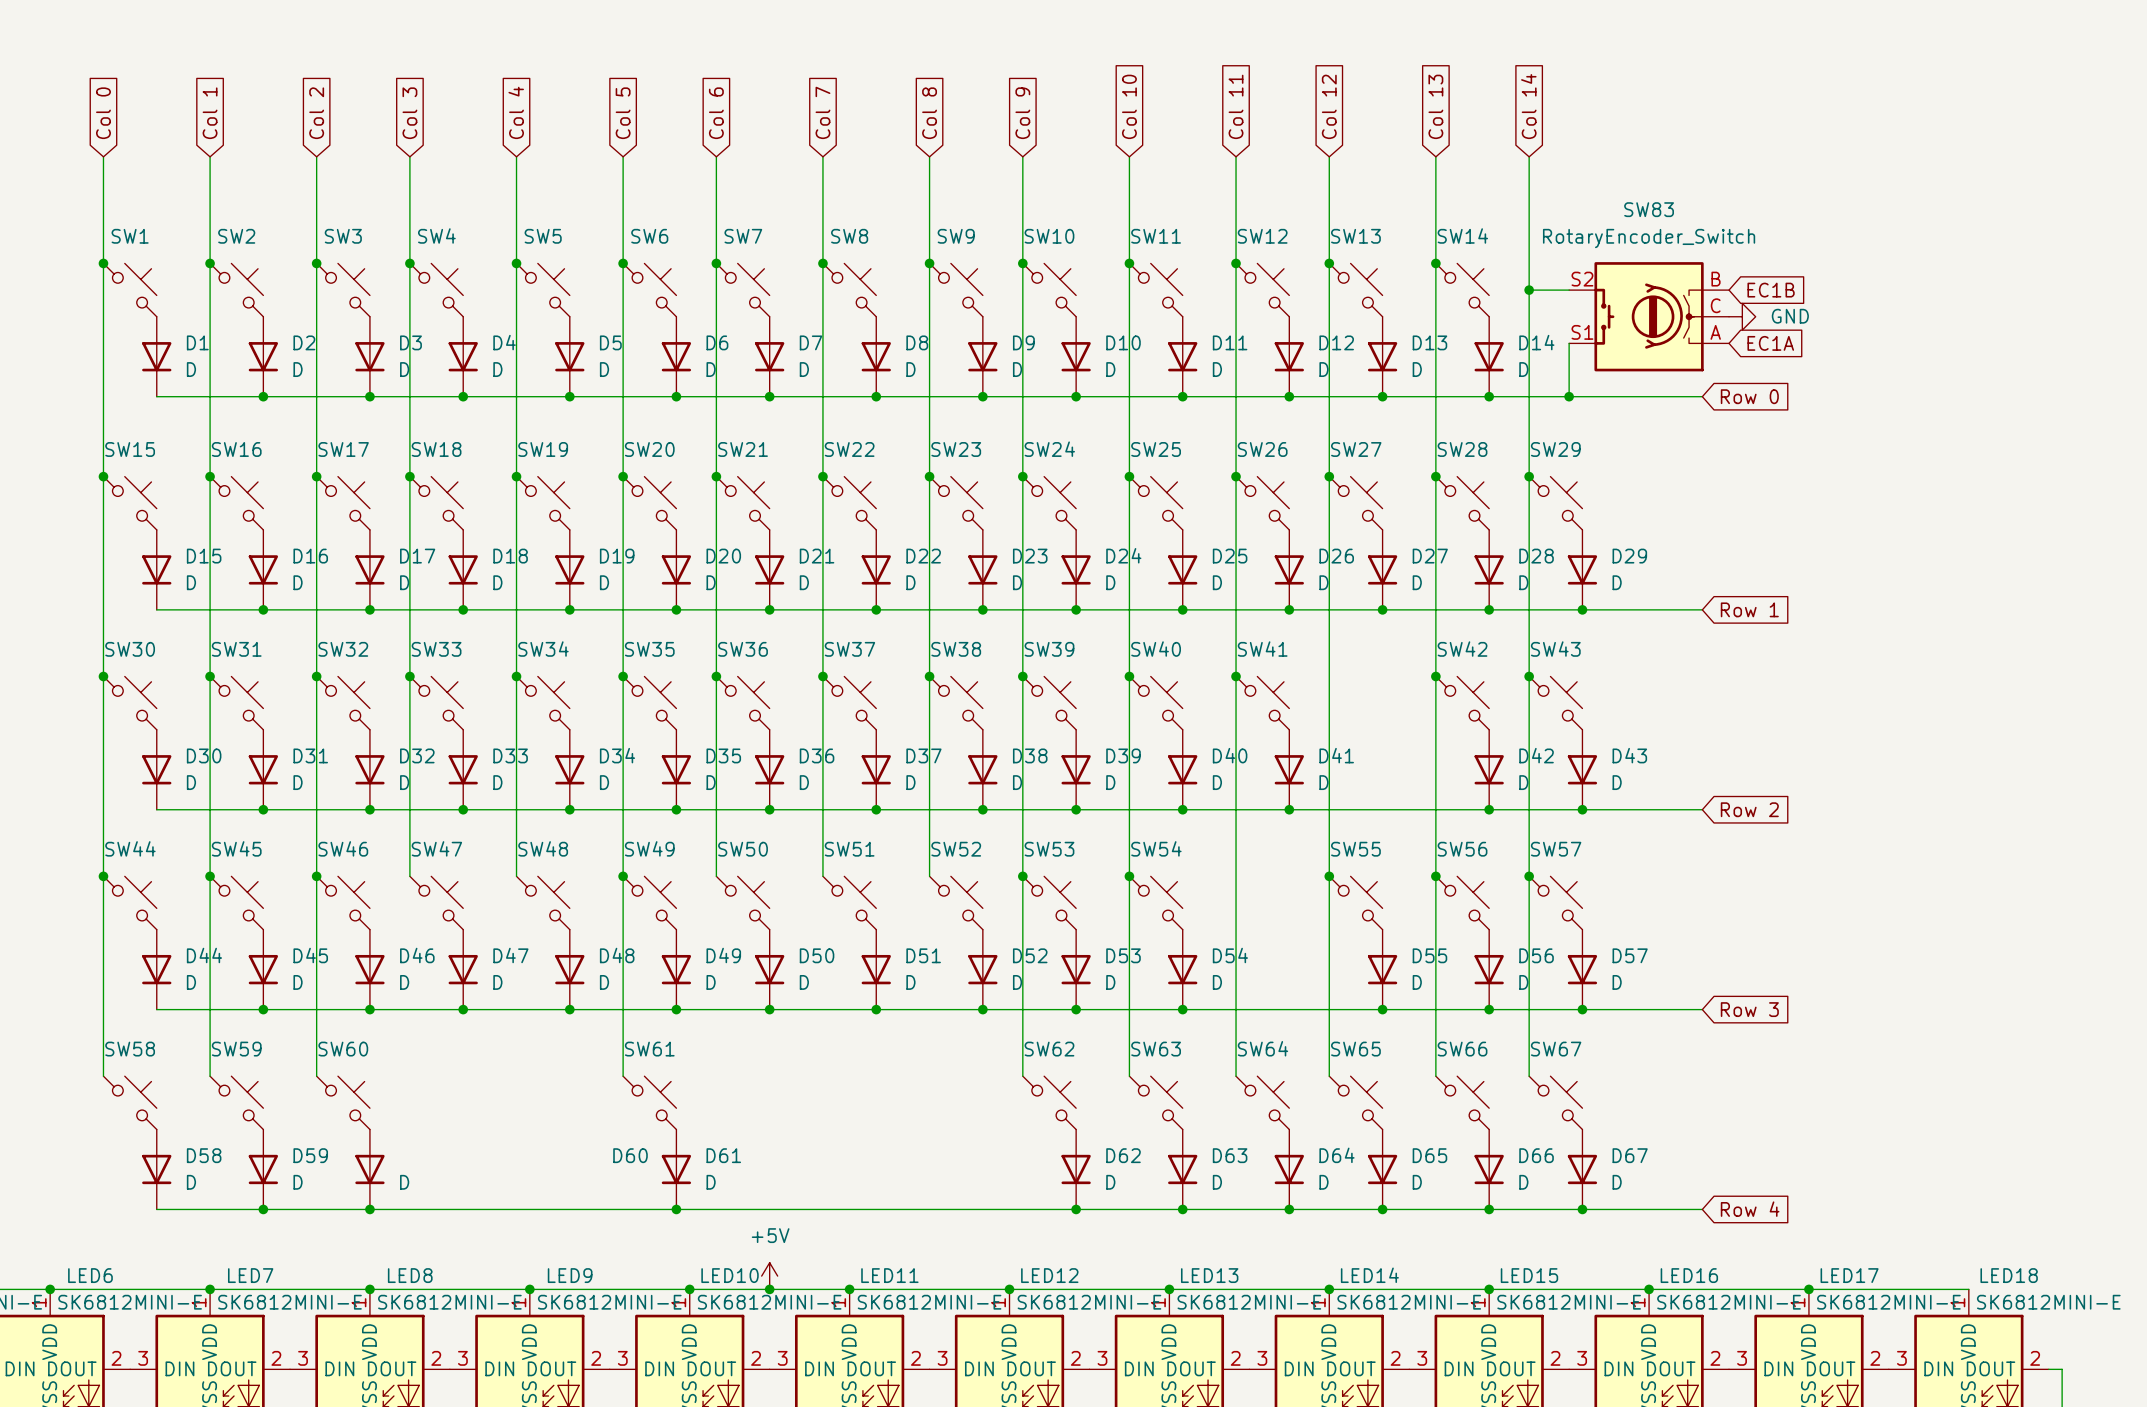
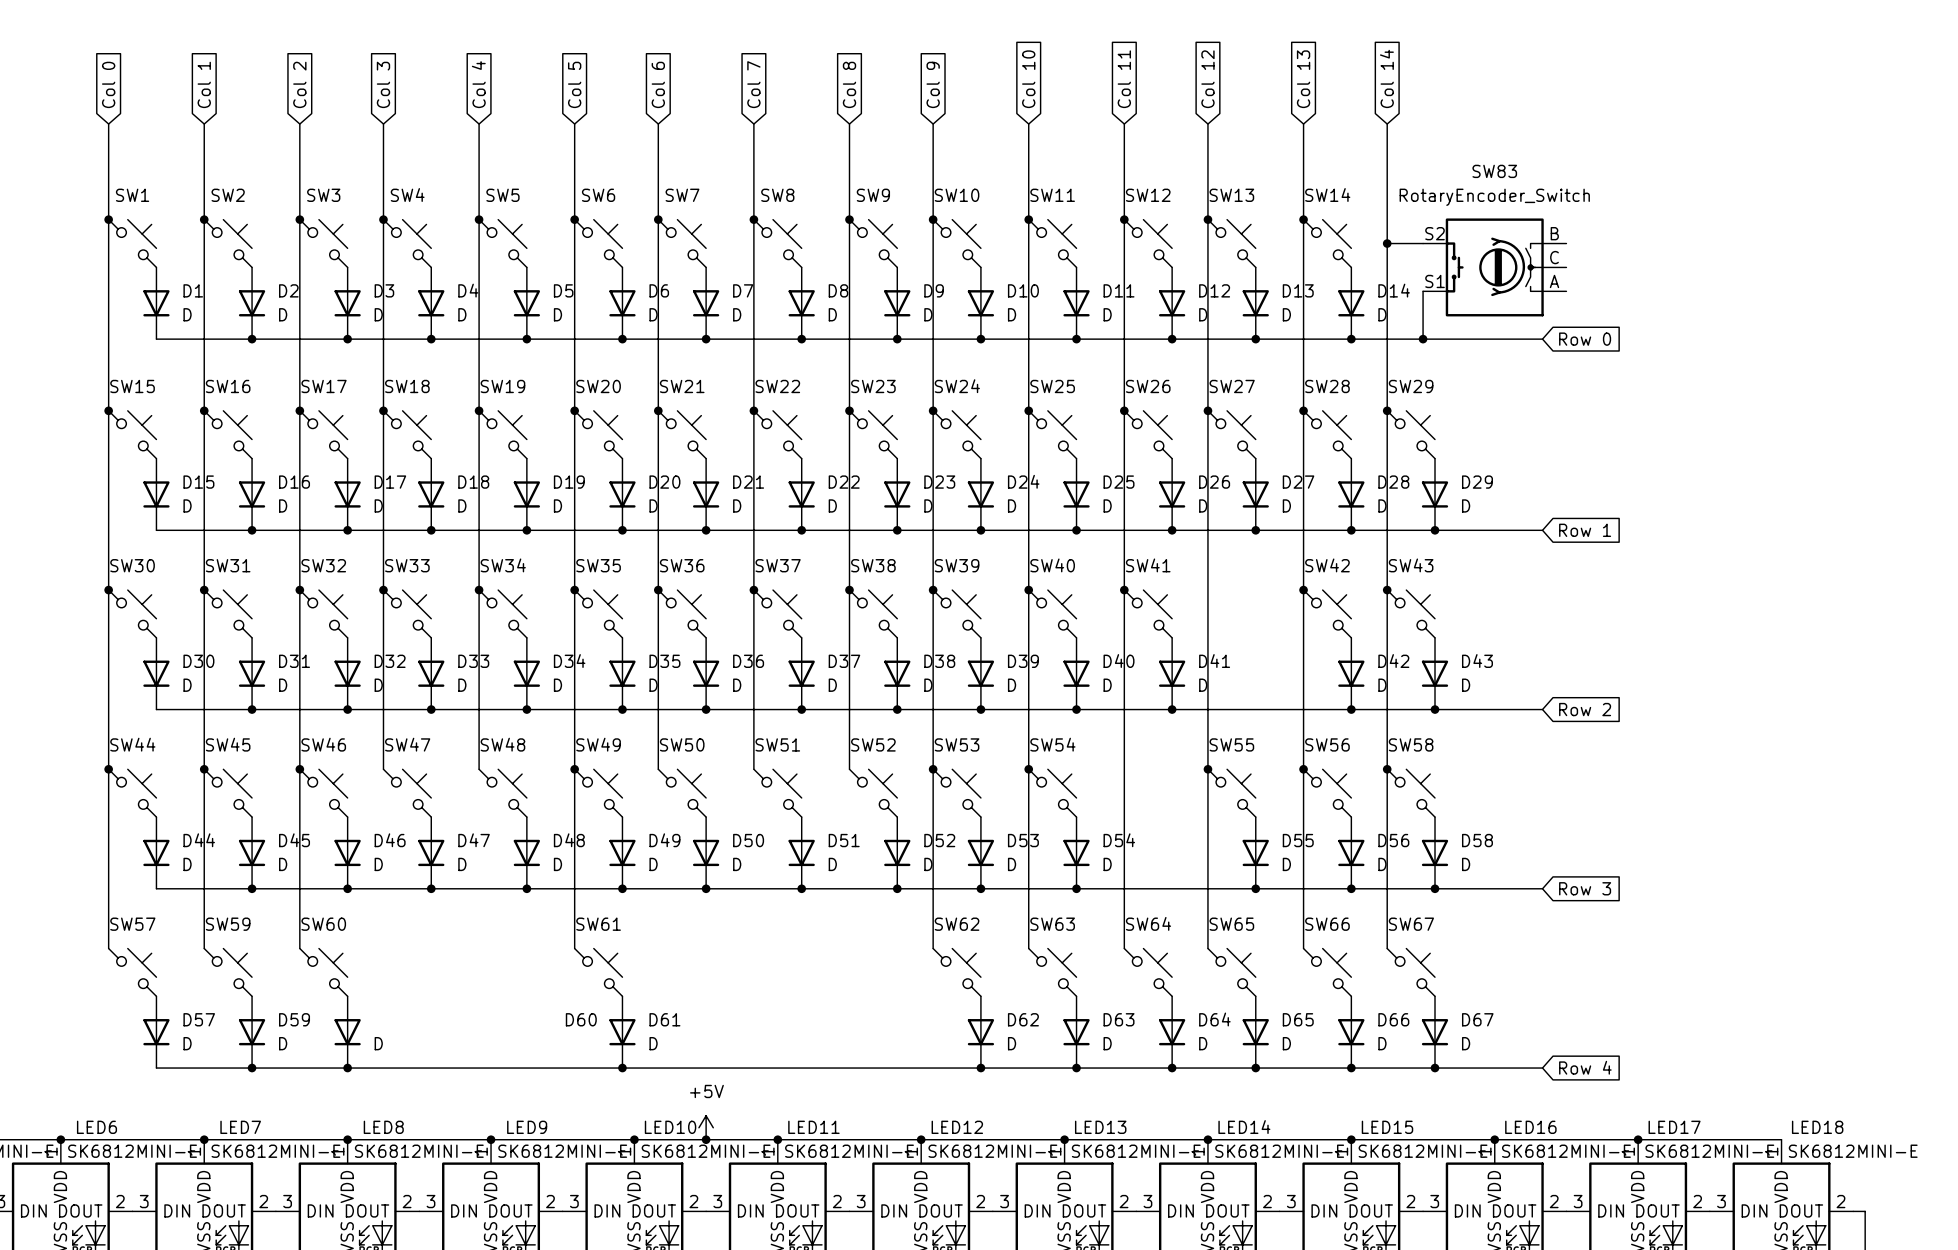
global label: EC1B (1771, 290) -> none
power symbol: GND (1742, 316) -> none
global label: EC1A (1770, 343) -> none
SW57 name: SW57 (1556, 849) -> SW58 (1411, 744)
D57 name: D57 (1630, 955) -> D58 (1477, 840)
SW58 name: SW58 (130, 1049) -> SW57 (132, 924)
D58 name: D58 (204, 1155) -> D57 (199, 1019)

